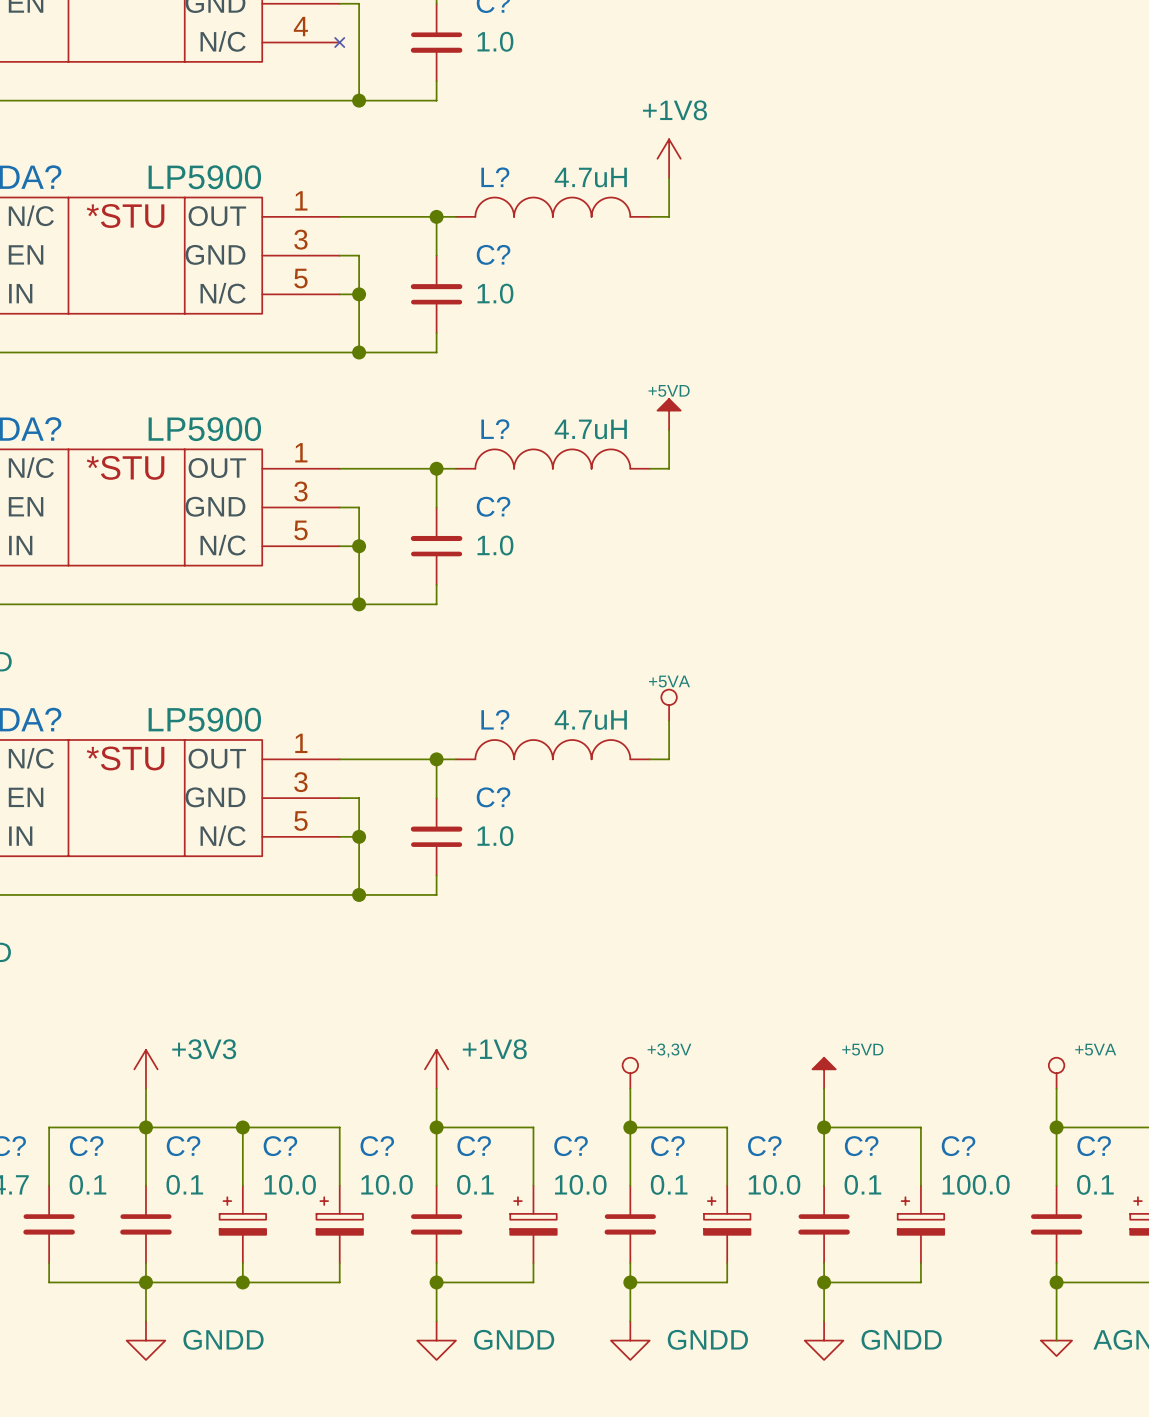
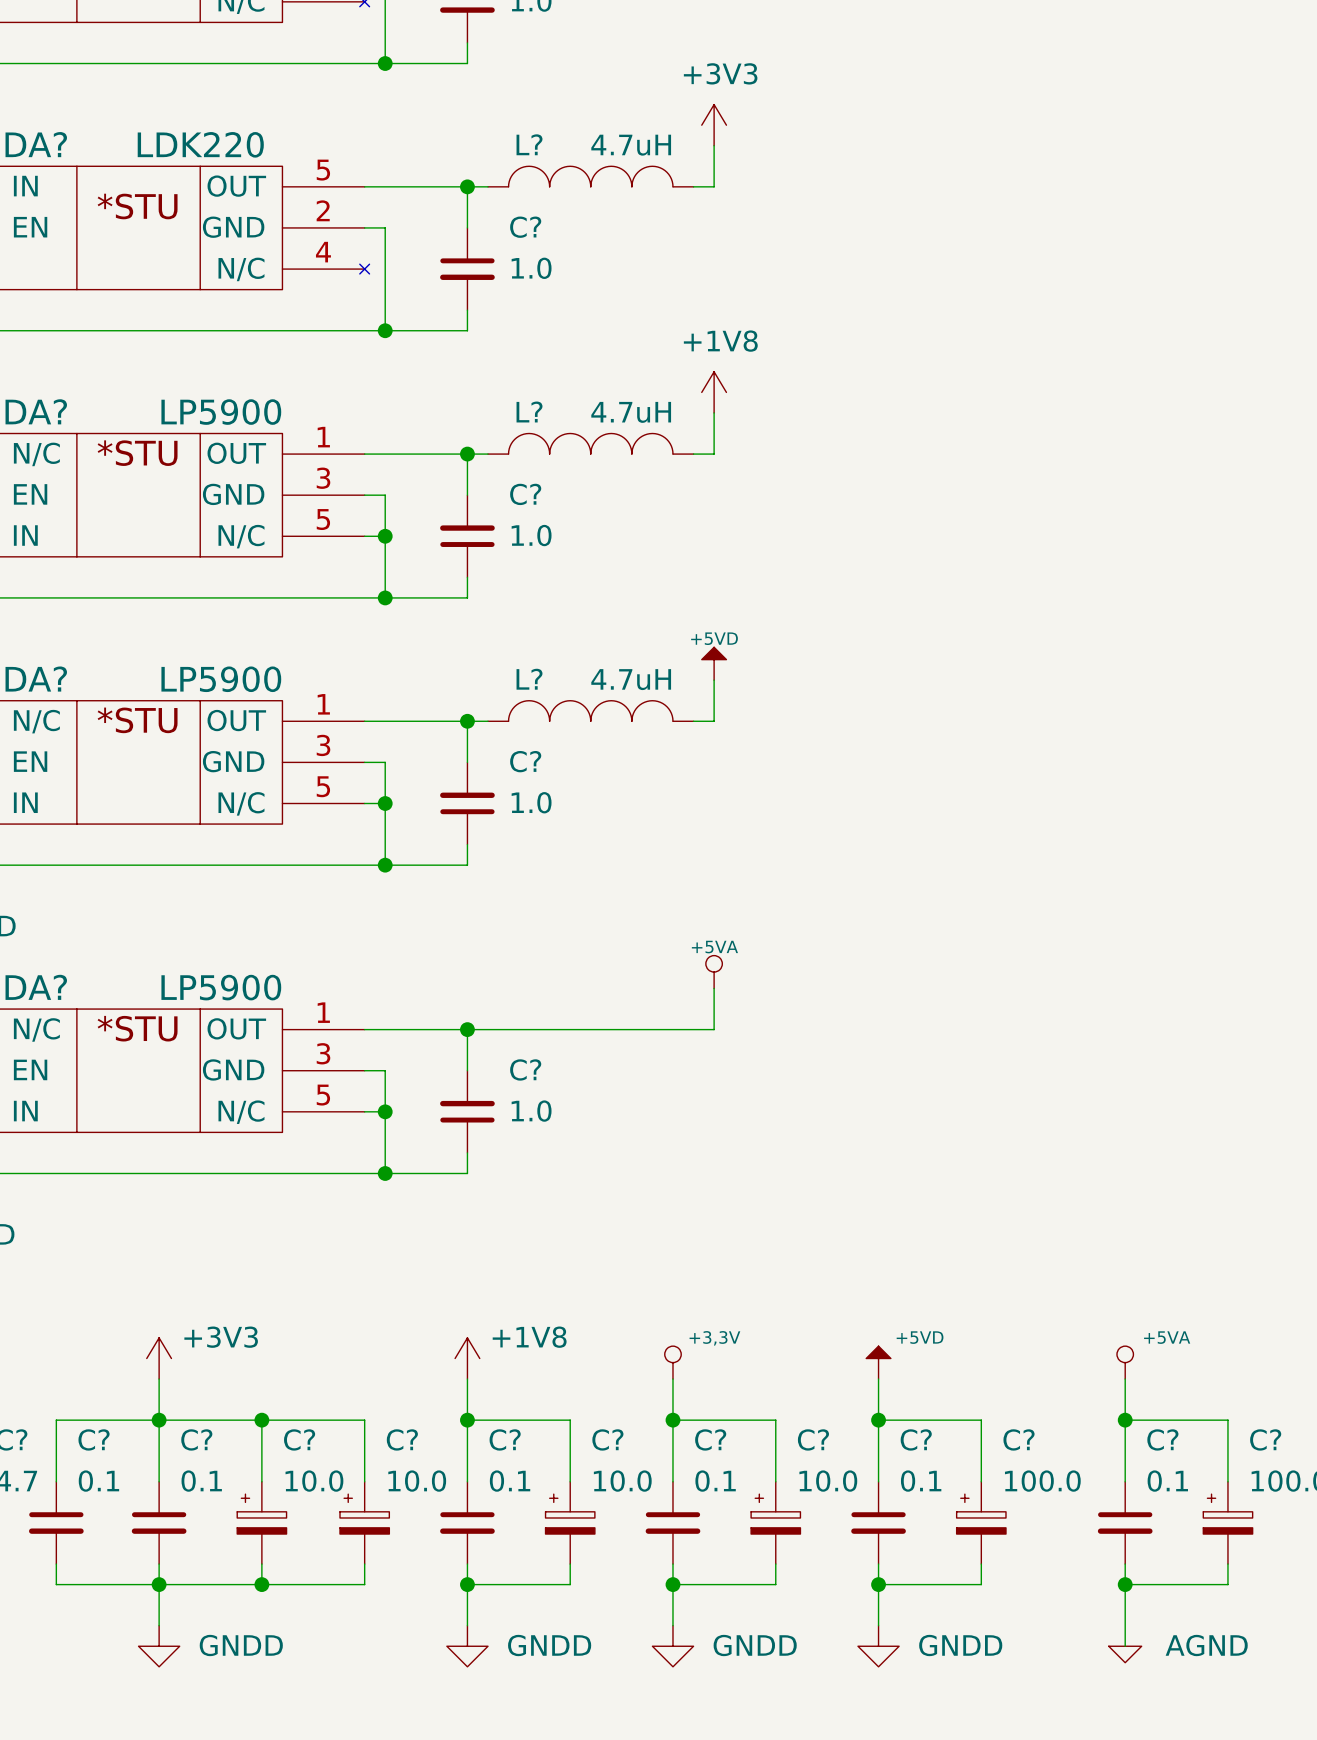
L?: 4.7uH (552, 749) -> none
wire: none -> (487, 1029) (693, 1029)

